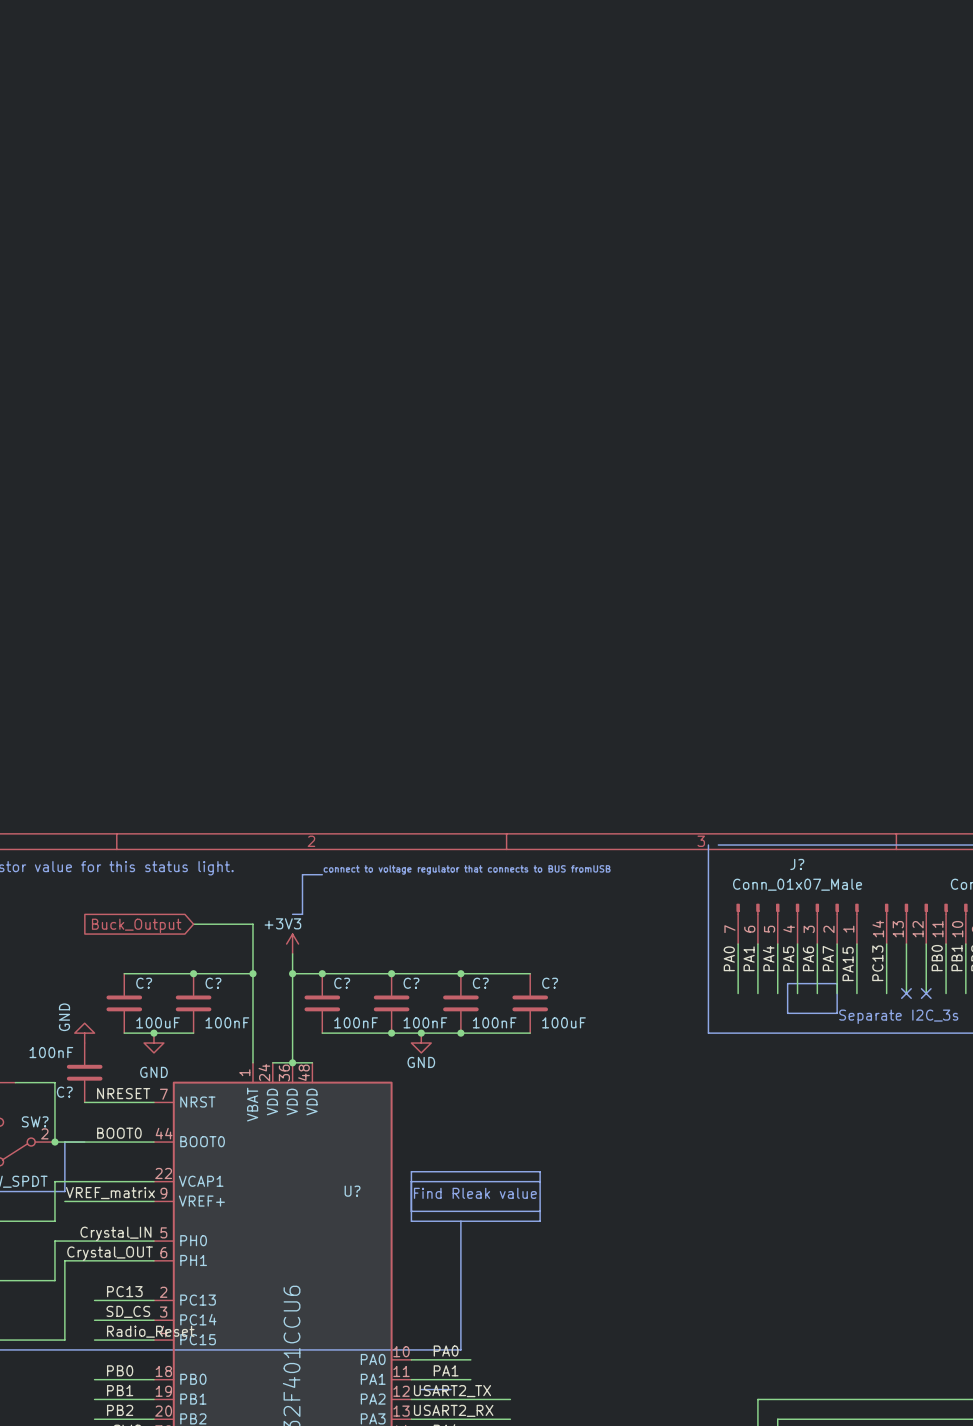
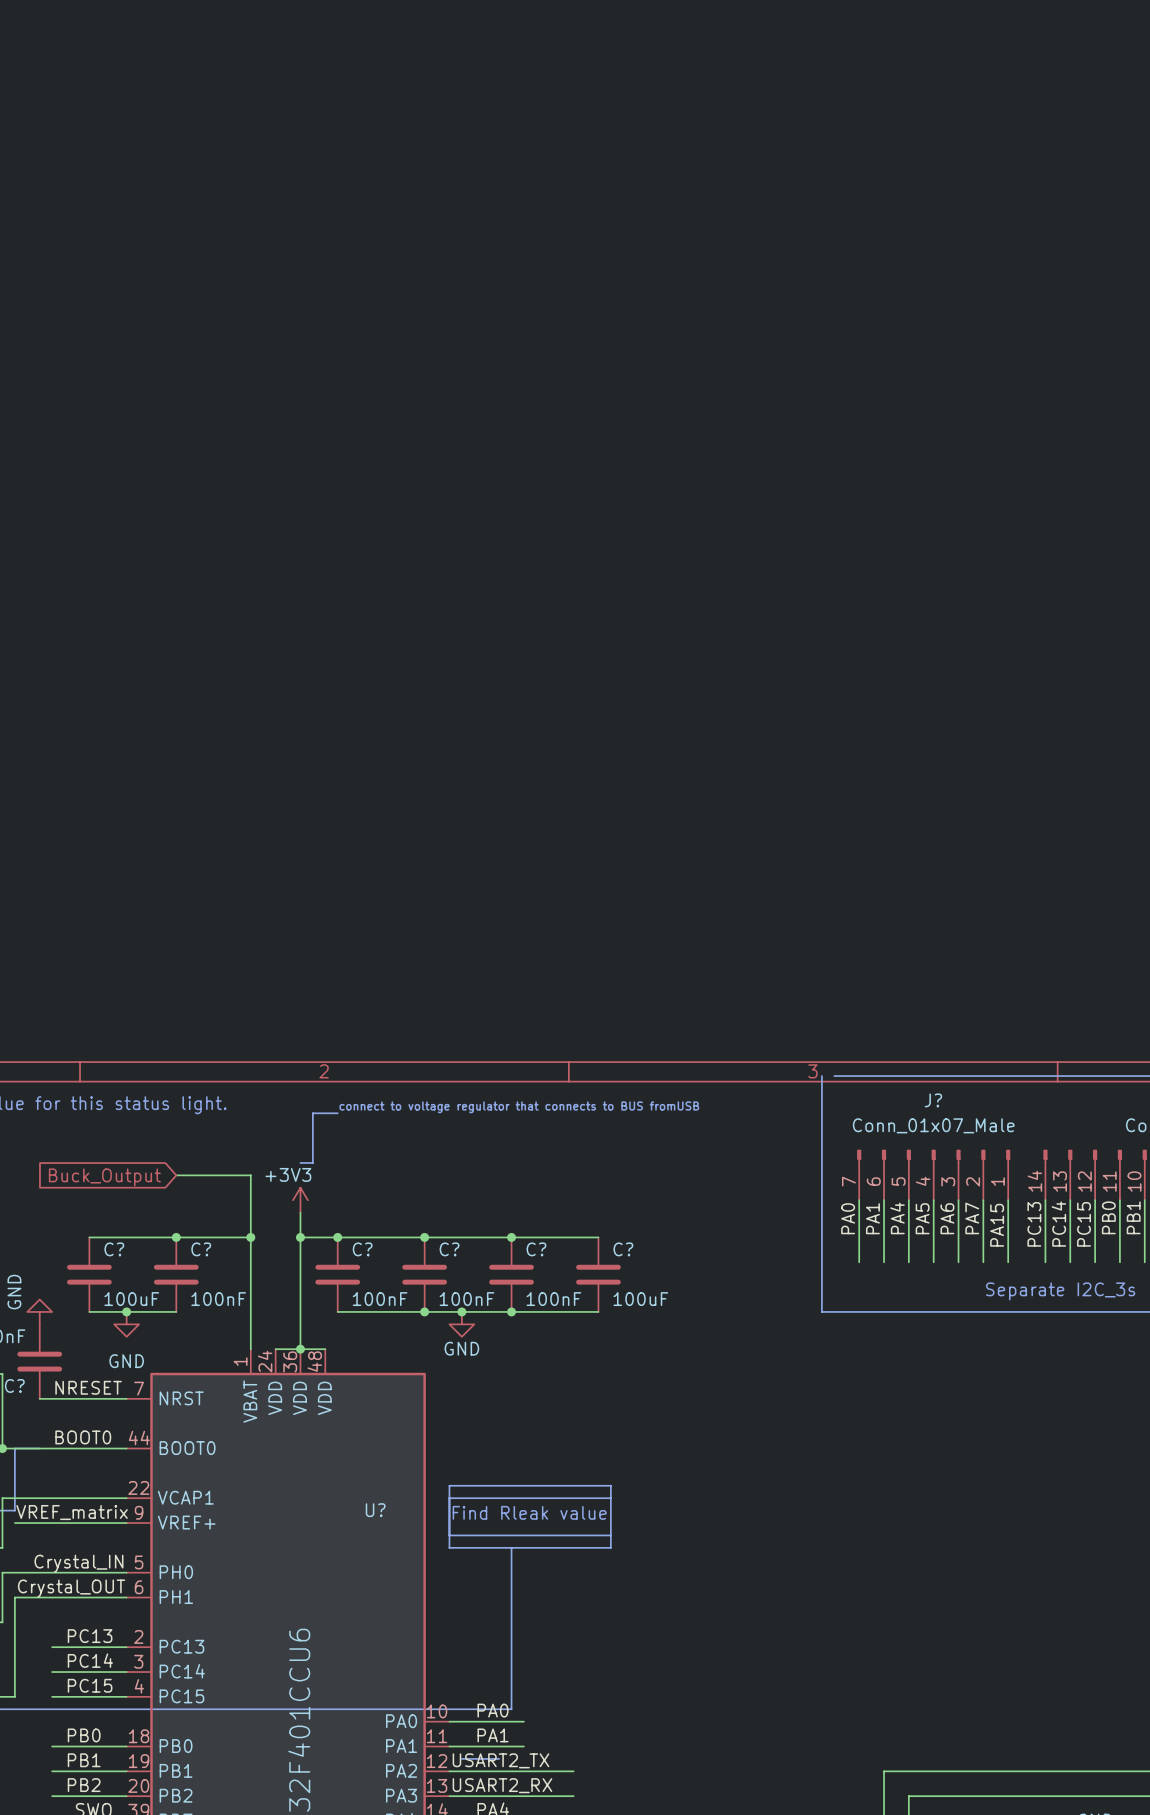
label: none -> PC14 (1058, 1224)
label: none -> PC15 (1084, 1224)
line: (787, 983) (837, 983) (837, 1013) (787, 1013) (787, 983) -> none
no-connect mark: (906, 993) -> none
no-connect mark: (926, 993) -> none
label: SD_CS (128, 1311) -> PC14 (90, 1660)
label: Radio_Reset (150, 1331) -> PC15 (90, 1685)

